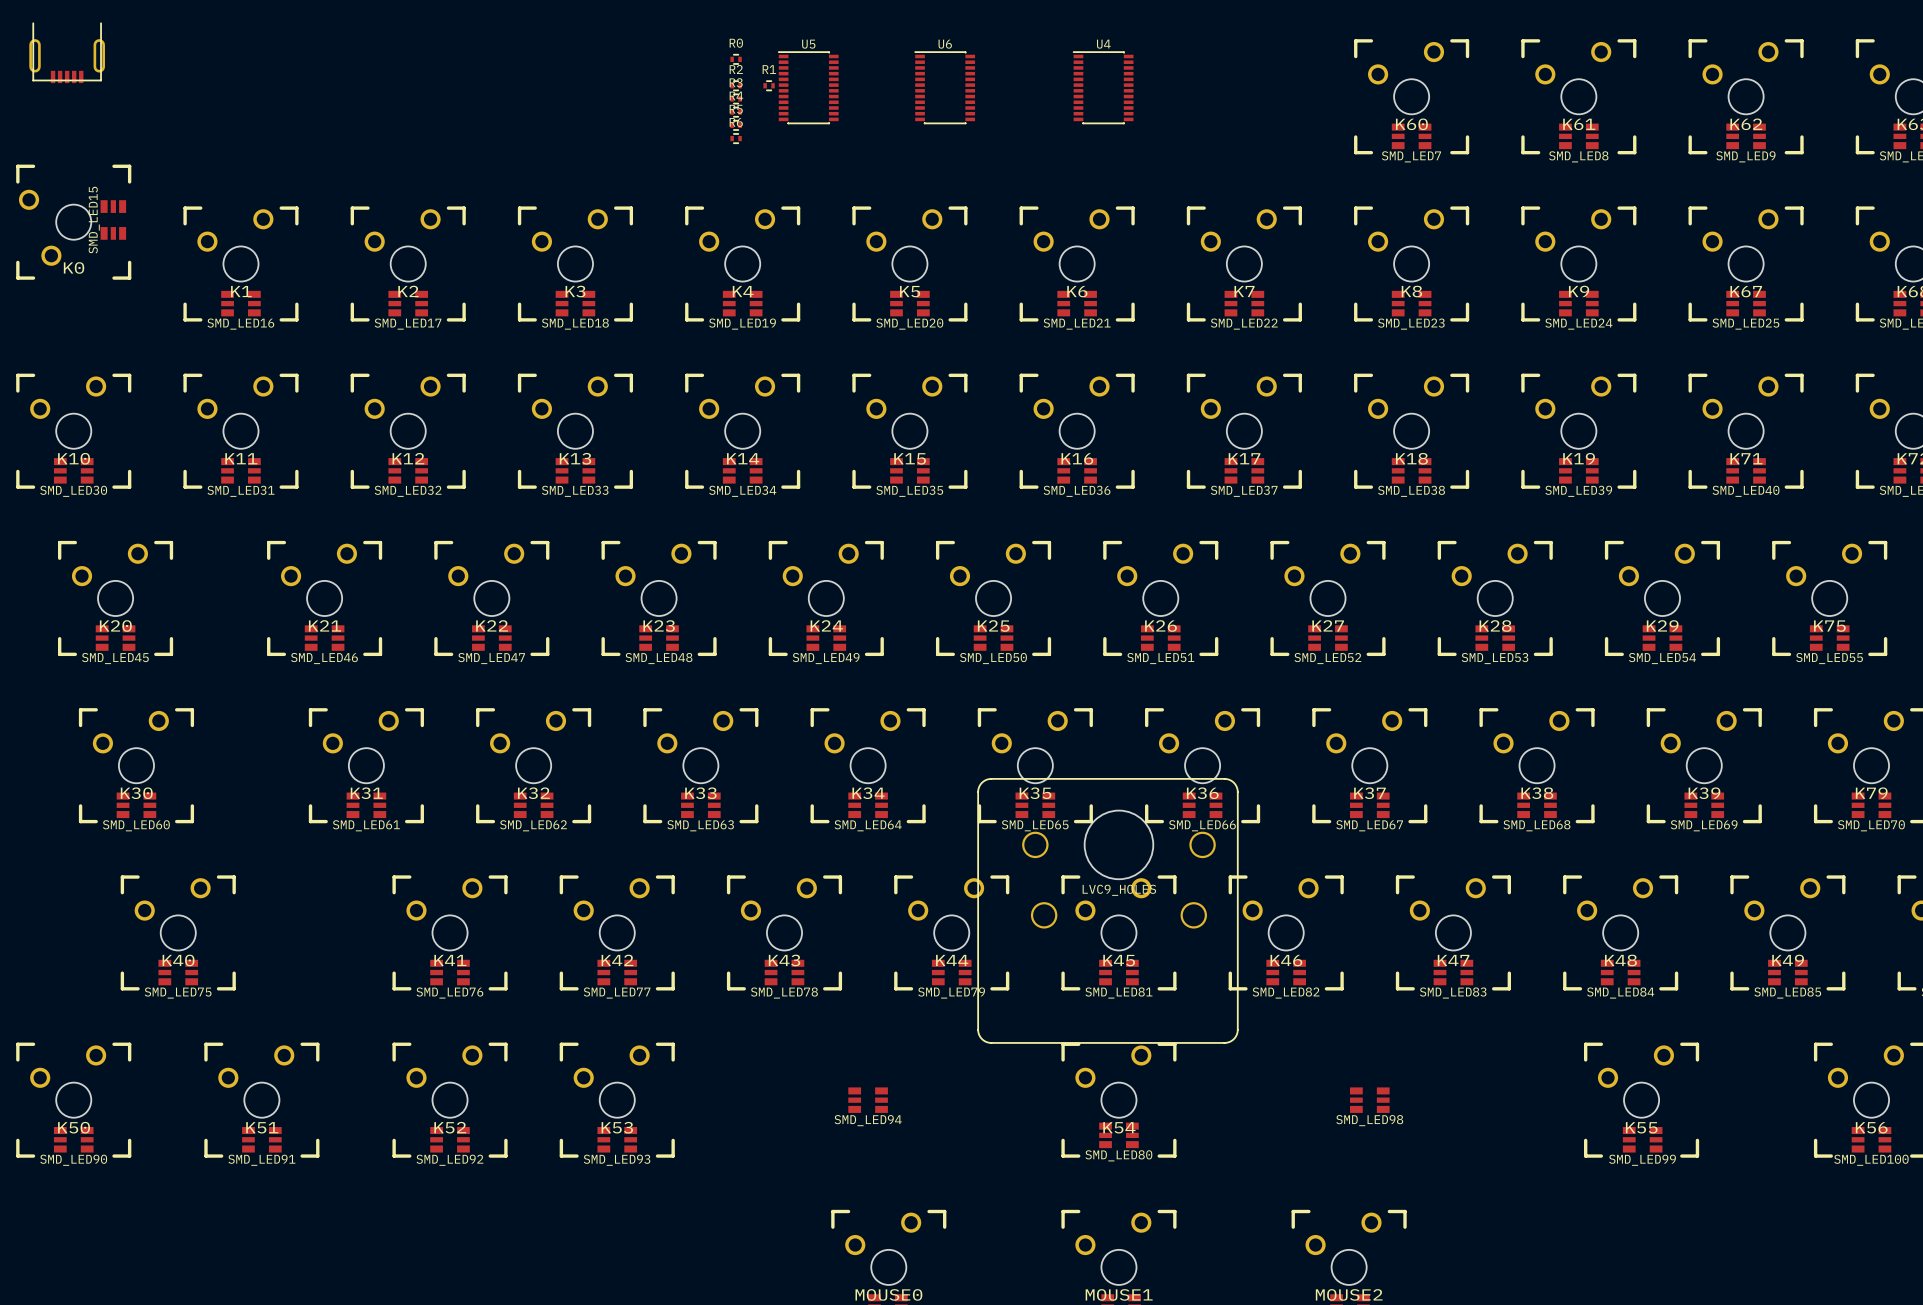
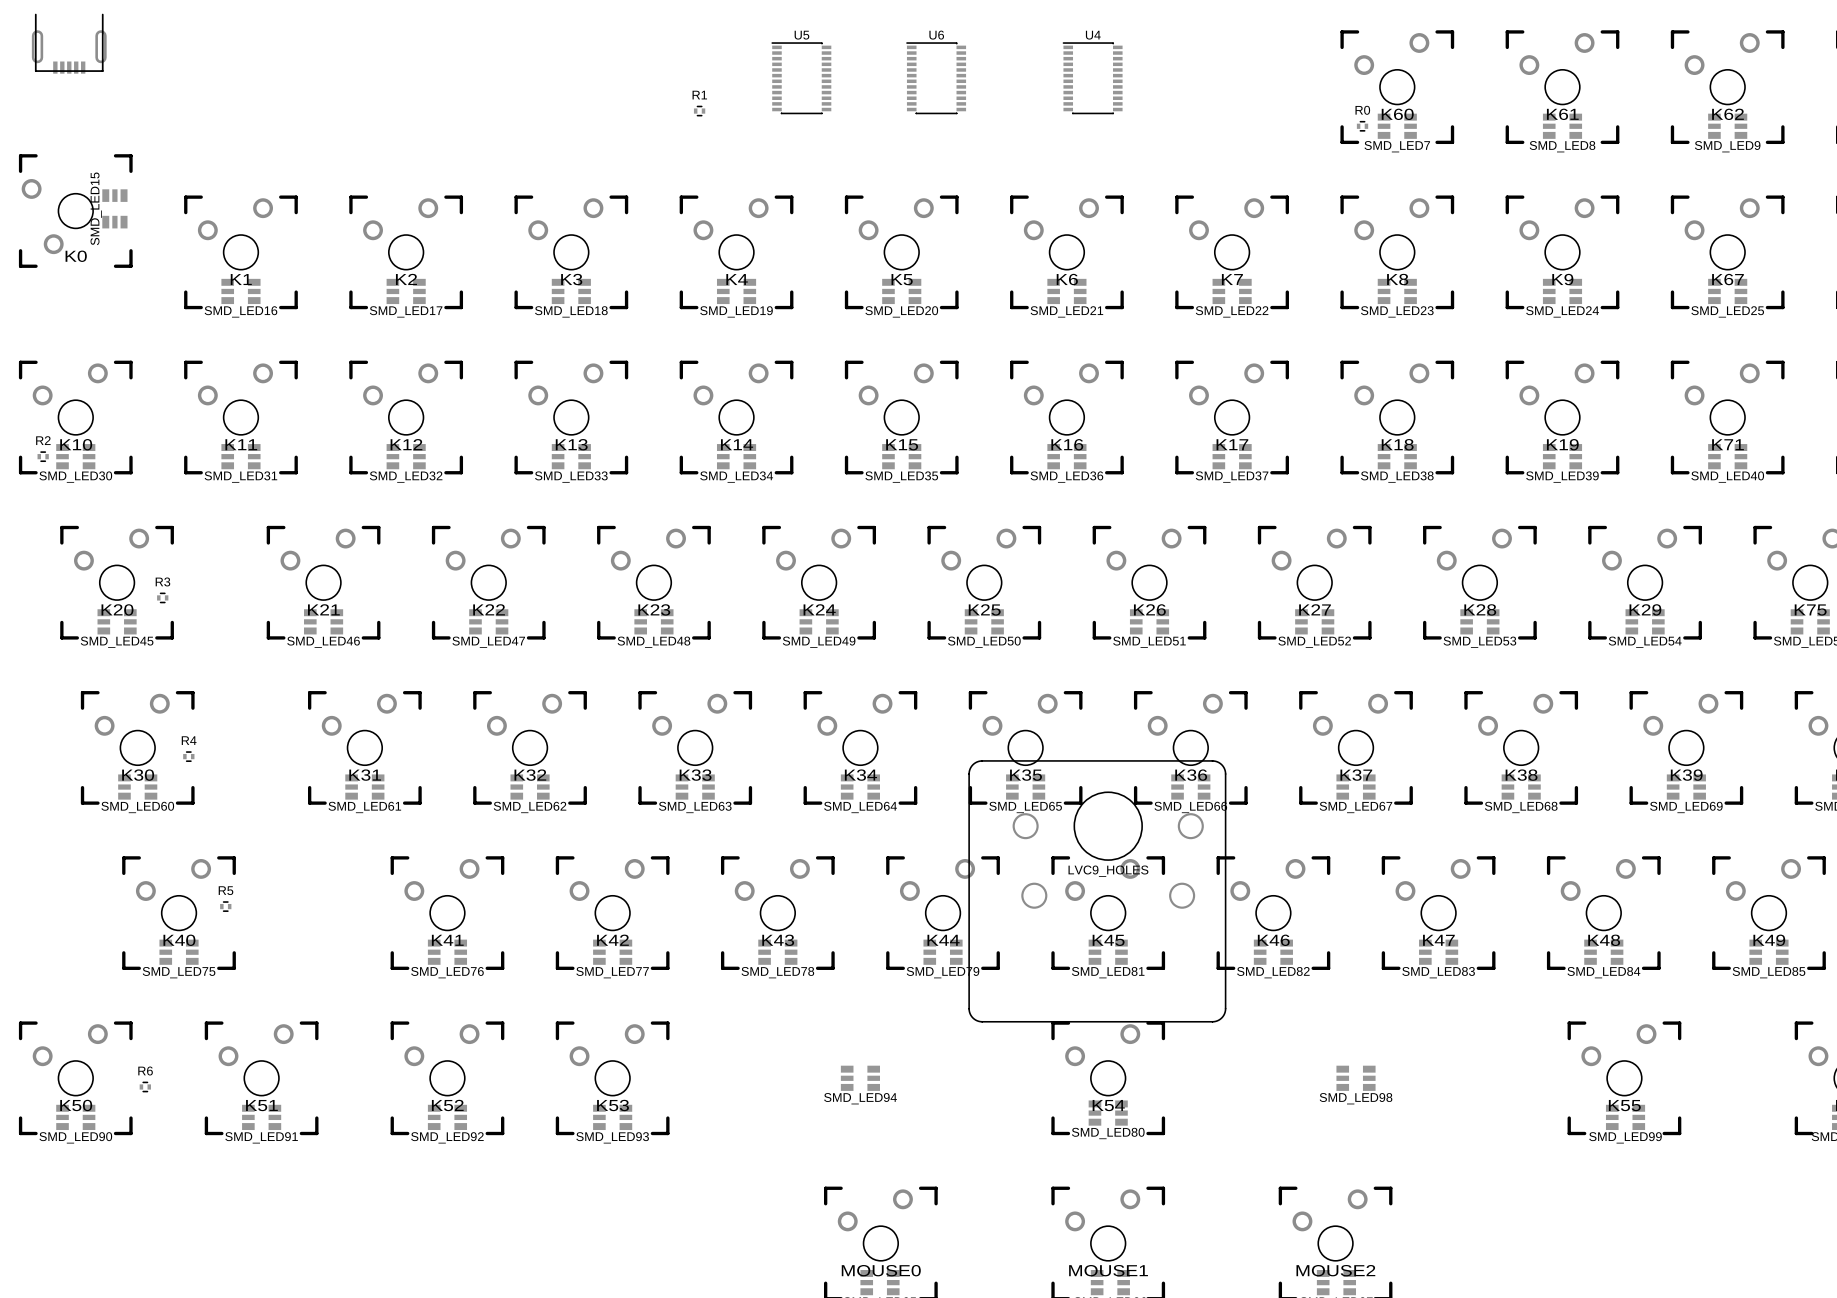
R0 position: (736, 59) -> (1362, 126)
R2 position: (736, 85) -> (43, 456)
R1 position: (769, 85) -> (699, 111)
R3 position: (736, 98) -> (162, 597)
R4 position: (736, 112) -> (188, 756)
R5 position: (736, 125) -> (225, 906)
R6 position: (736, 138) -> (145, 1086)

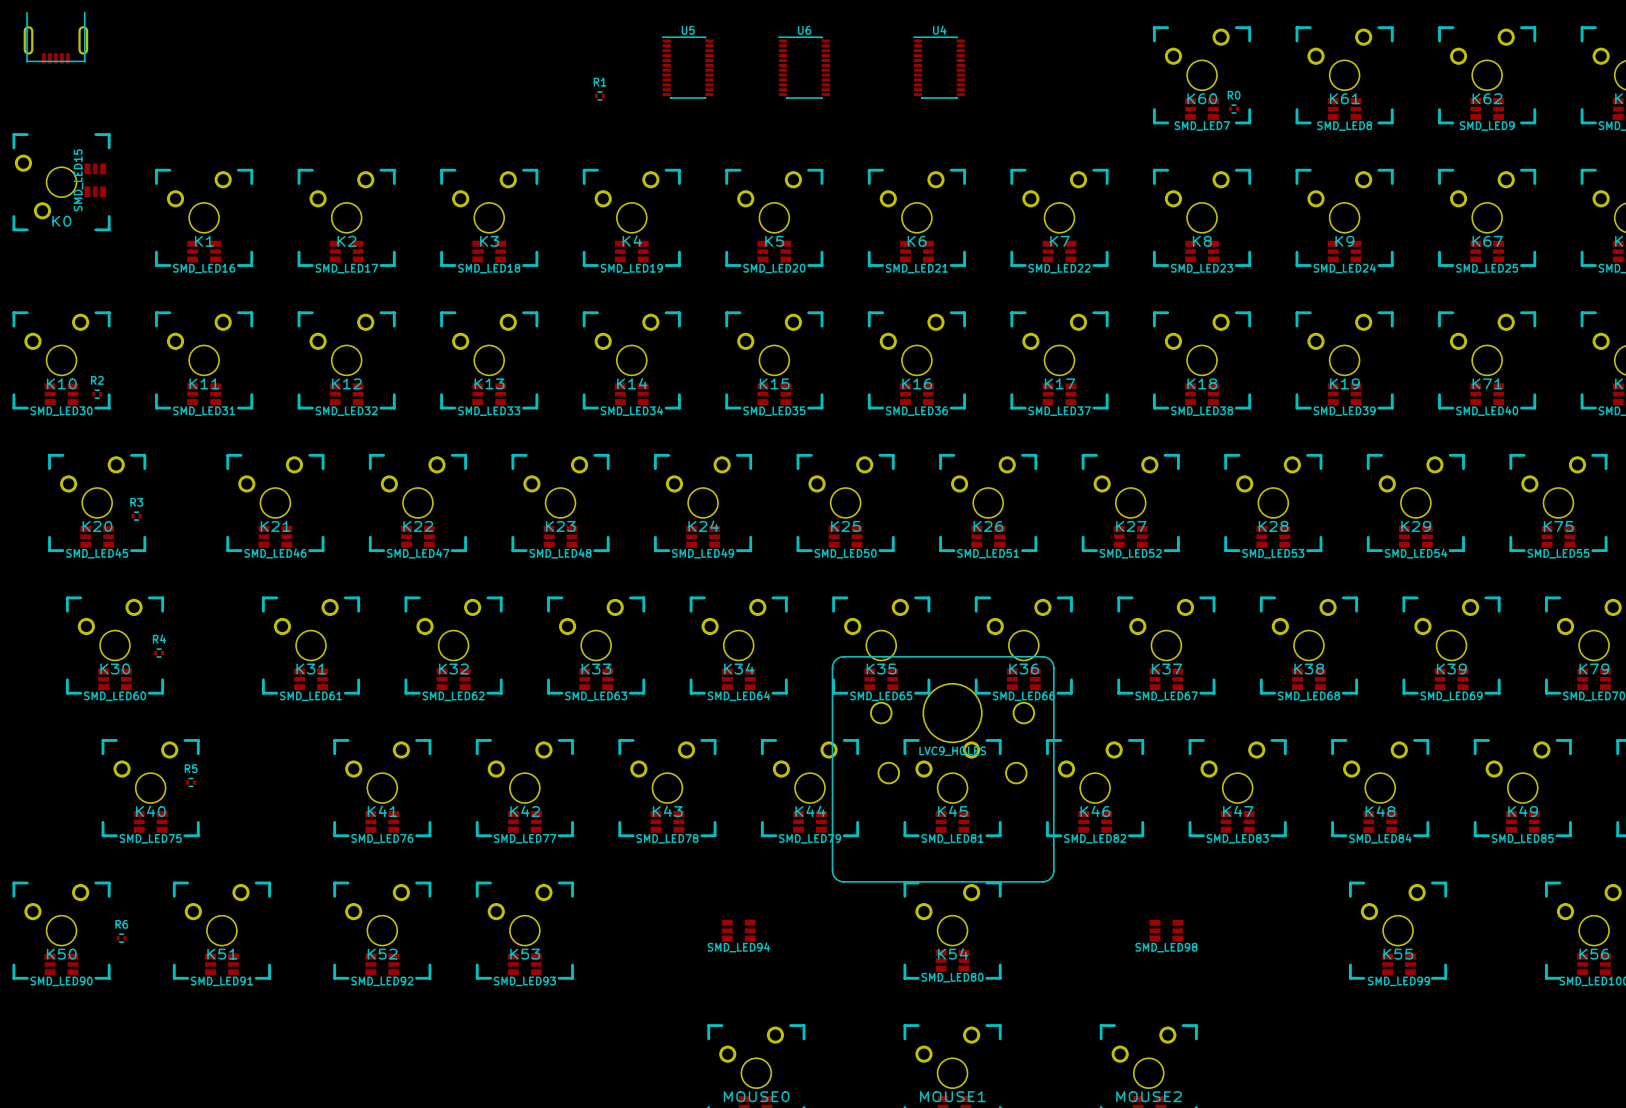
R0 position: (1362, 126) -> (1233, 109)
R2 position: (43, 456) -> (97, 394)

